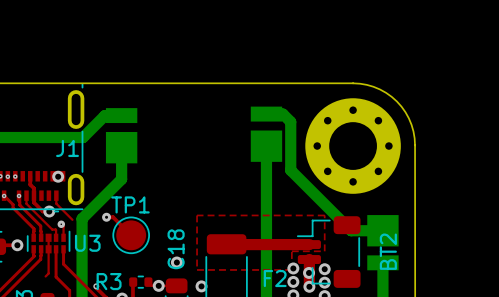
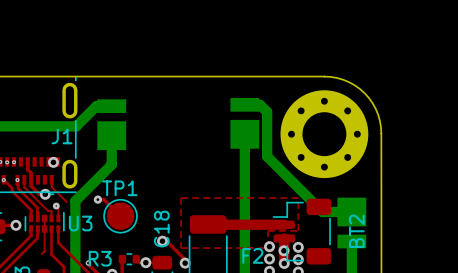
top track: none -> (162, 241) (166, 241) (185, 259) (185, 263)

